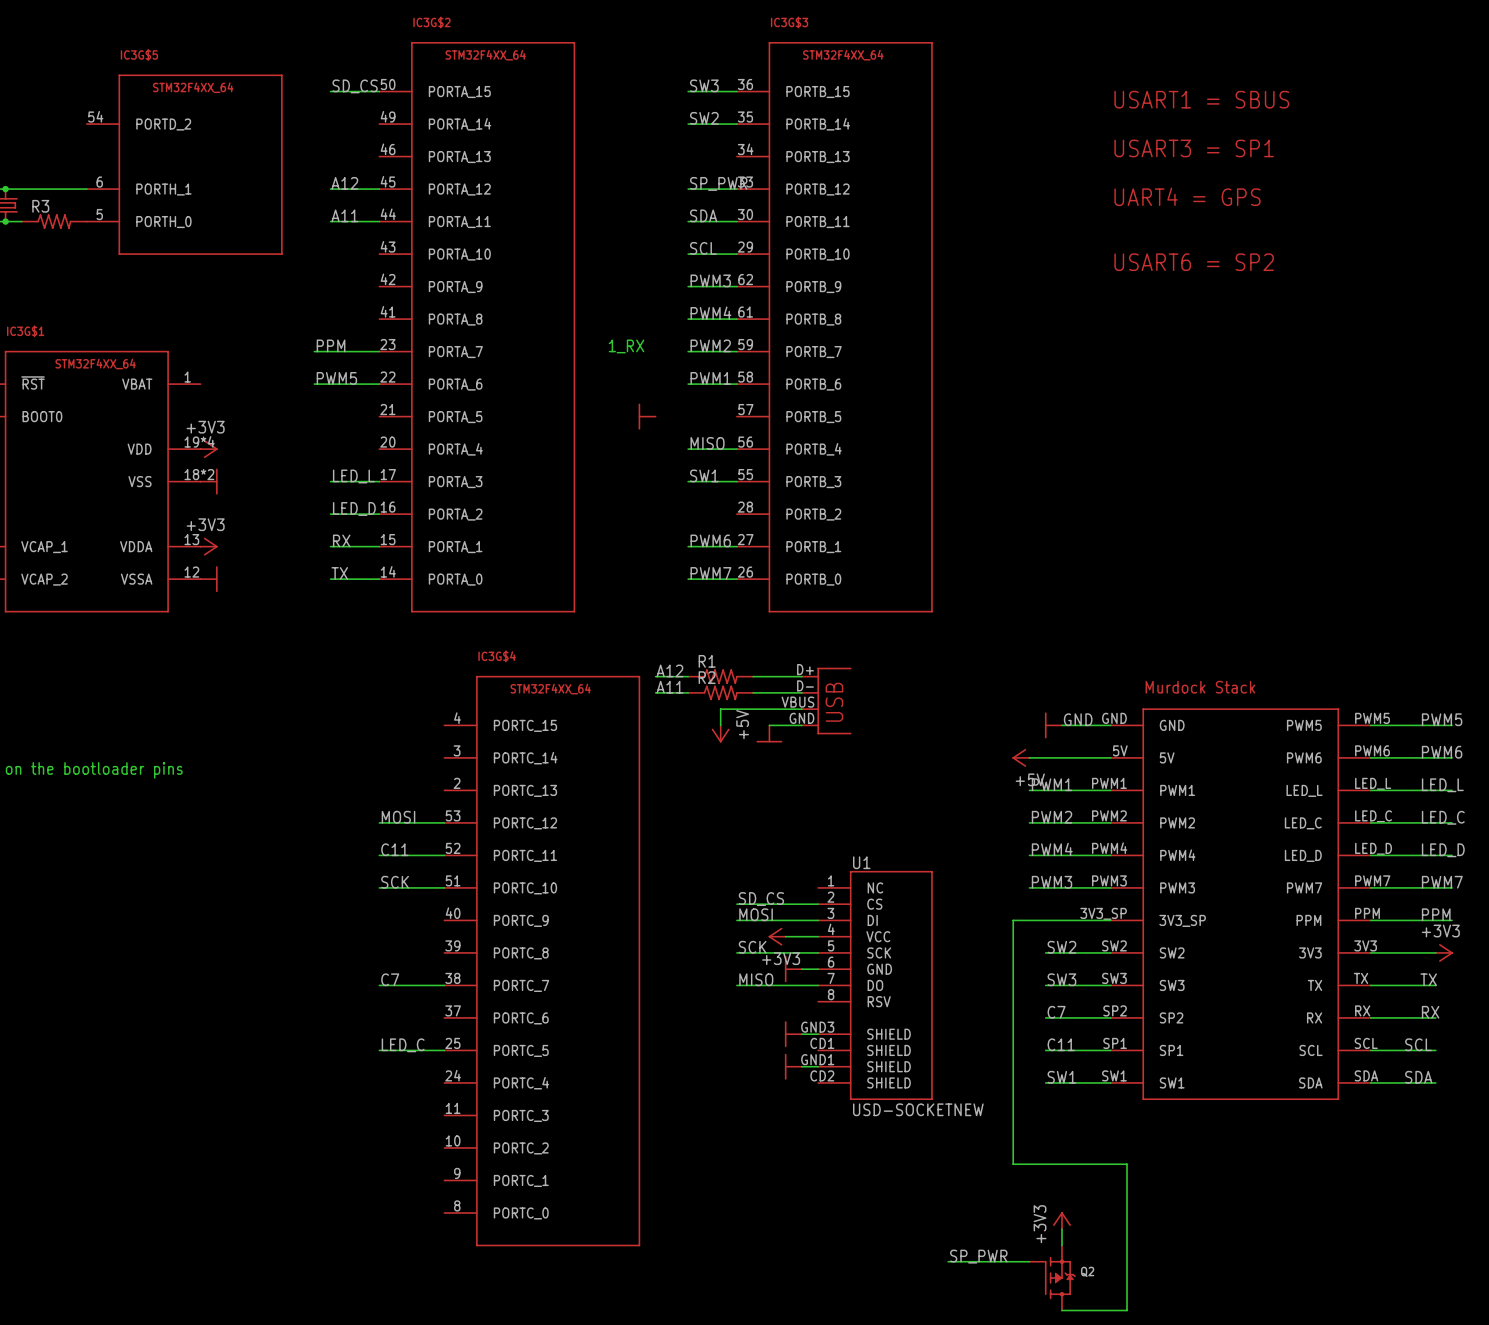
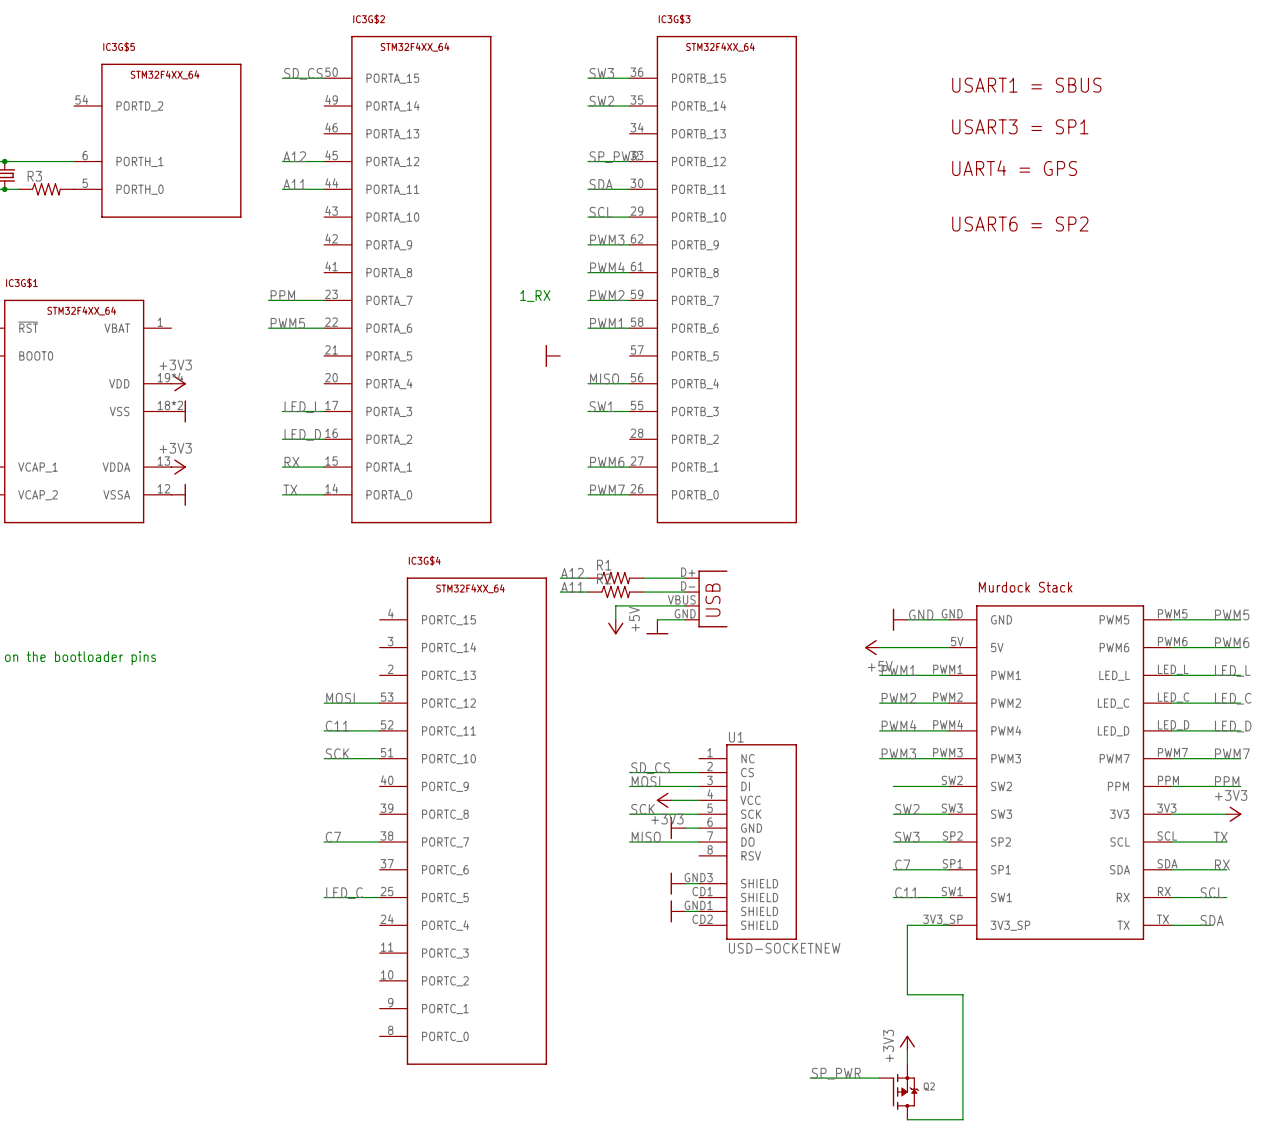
part symbol: [1110, 708, 1371, 1101] -> [949, 605, 1172, 940]
wire: (1045, 920) (1013, 920) (1013, 1164) (1061, 1164) -> none
label: SW1 (1061, 1077) -> none
wire: (1045, 1082) (1061, 1082) -> (907, 994) (907, 925)
wire: (1419, 1082) (1435, 1082) -> none

